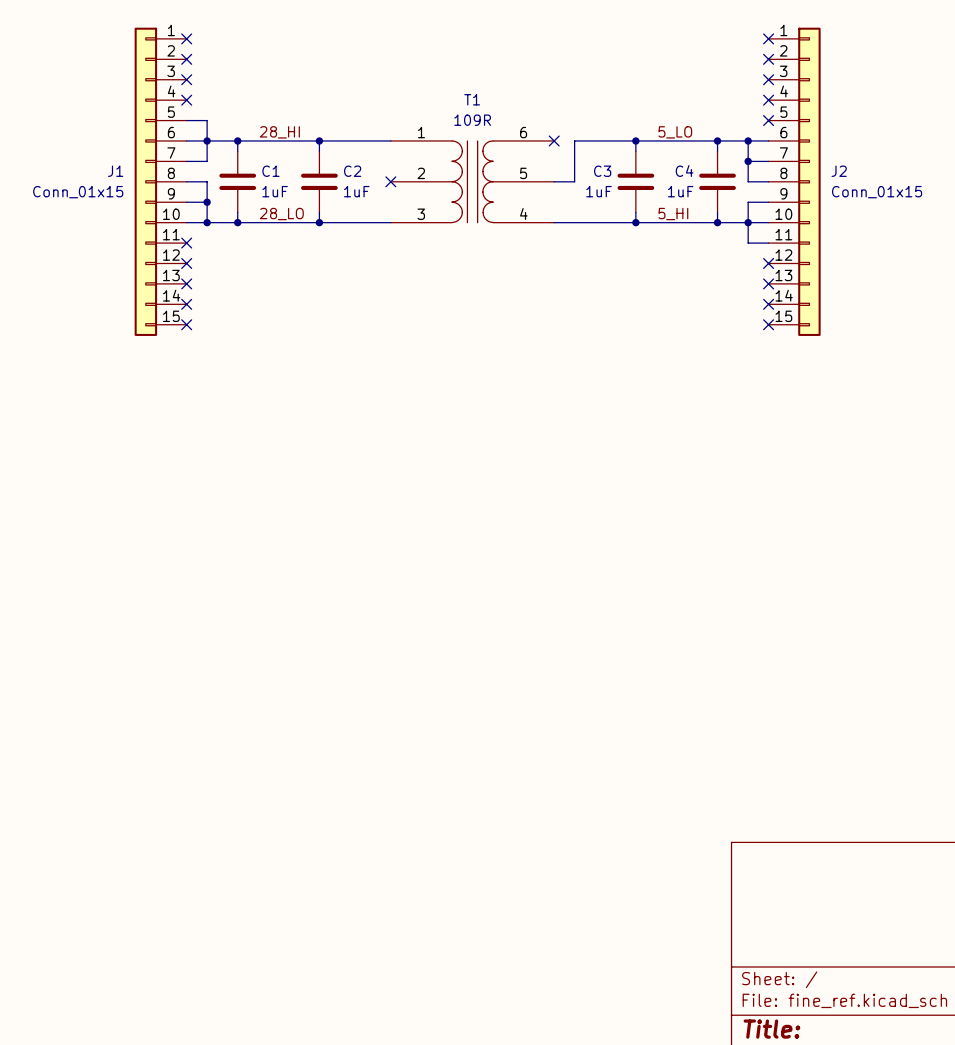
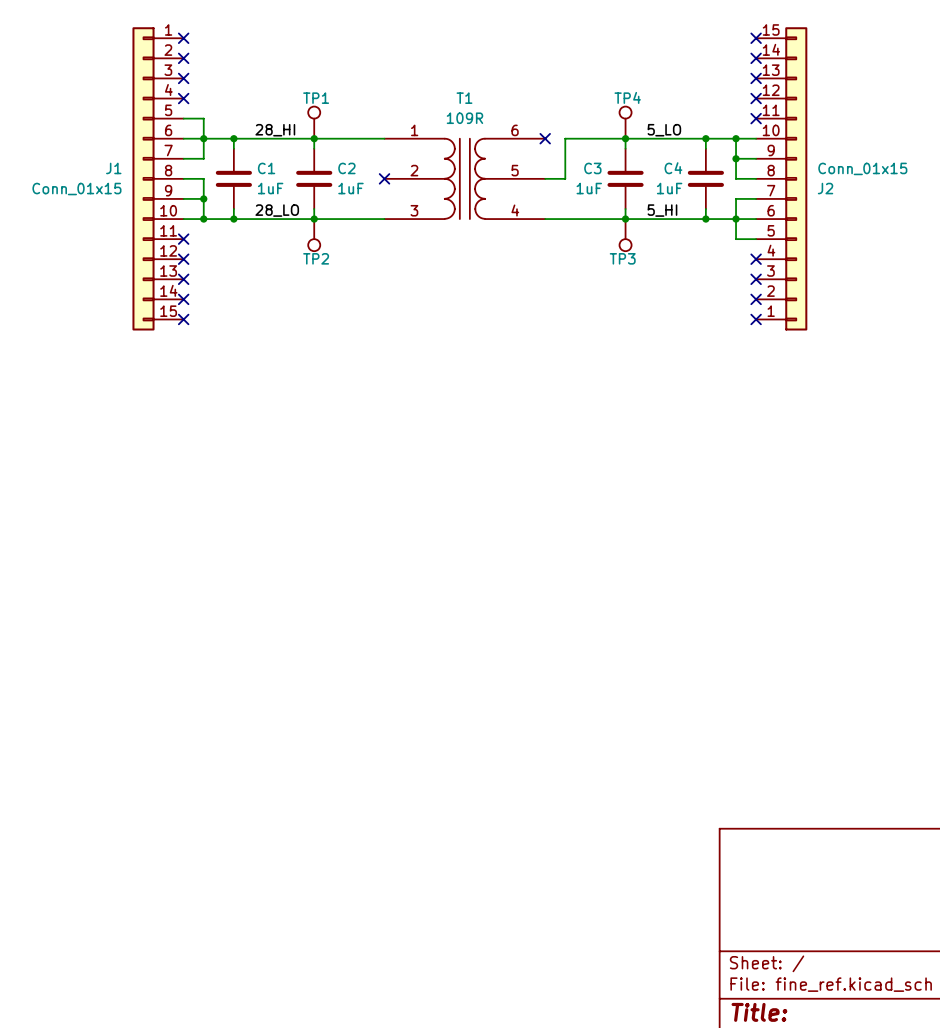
TP1: none -> (314, 122)
TP4: none -> (625, 122)
J2 flip: as is (809, 181) -> up-down (796, 178)
TP2: none -> (314, 235)
TP3: none -> (625, 235)

